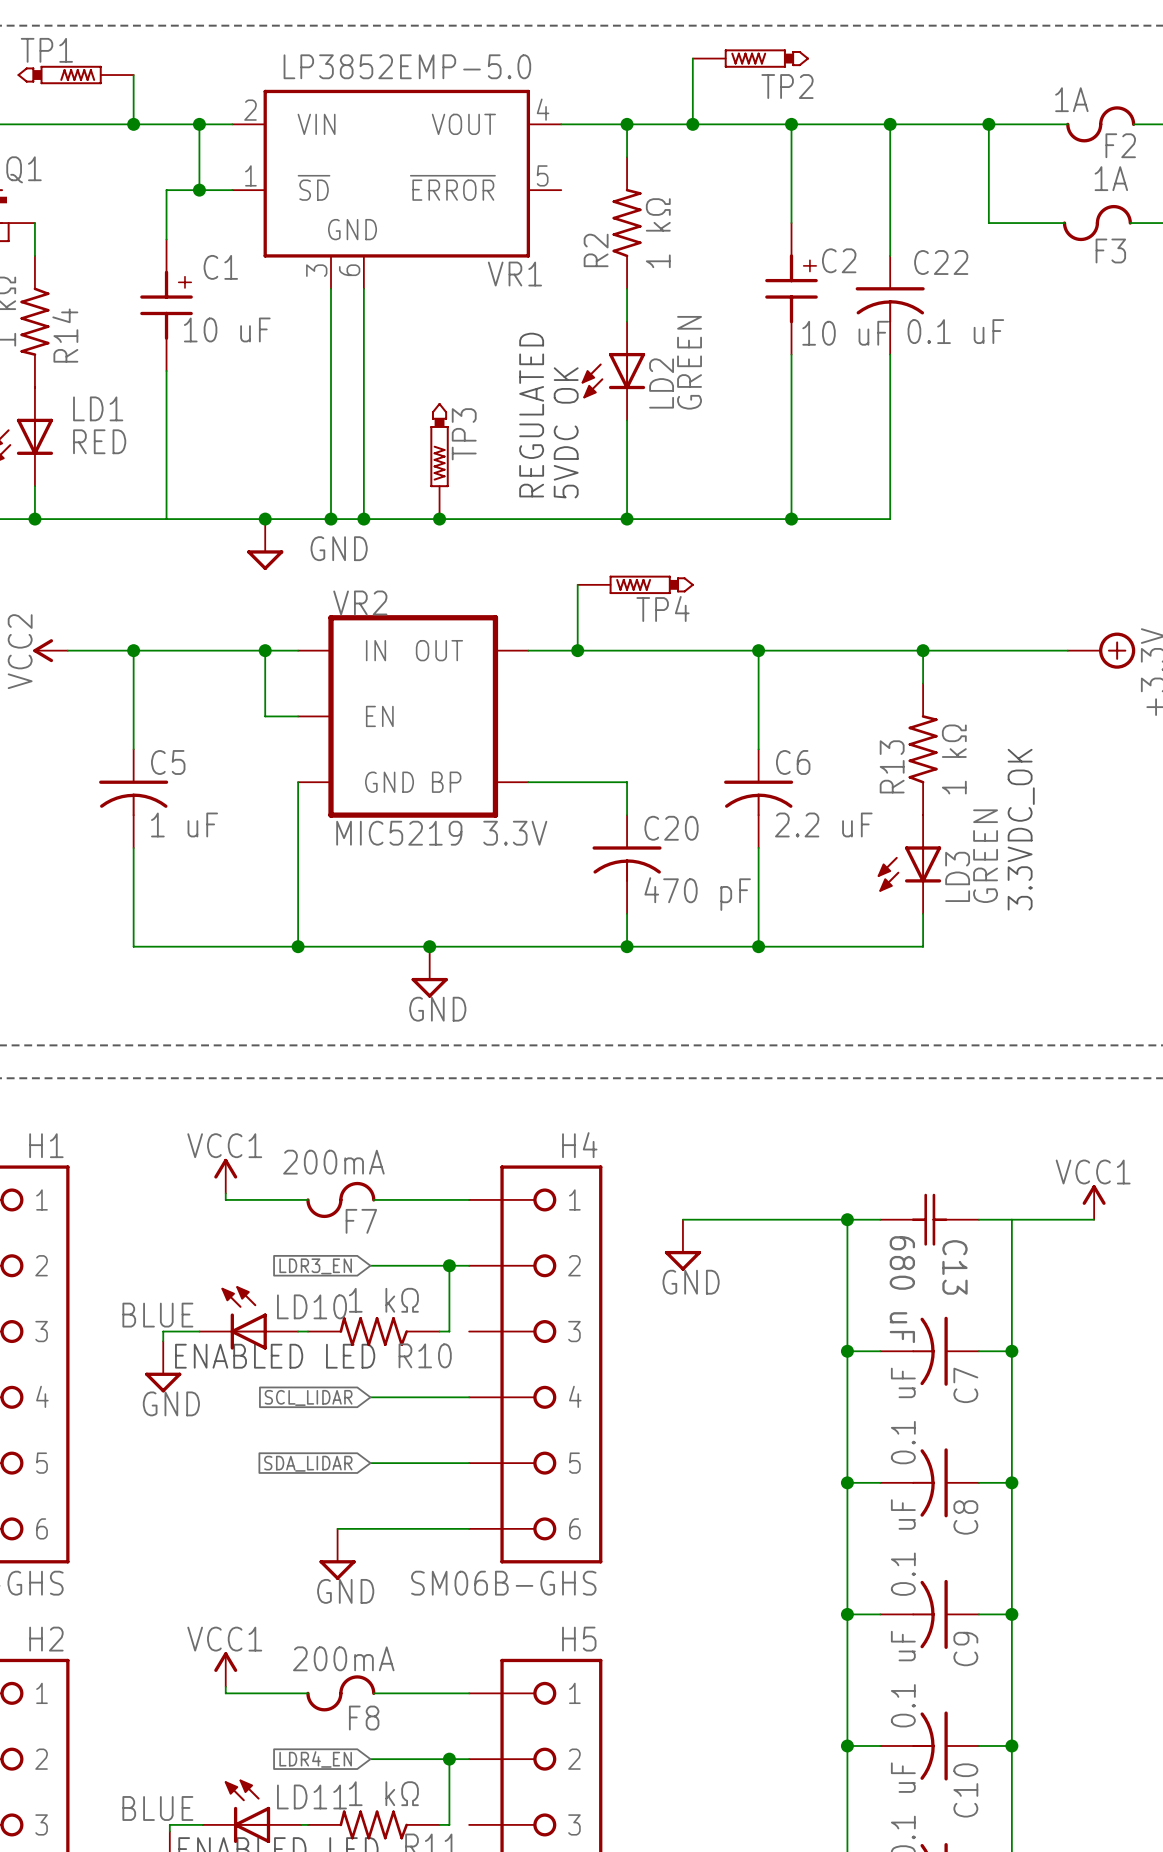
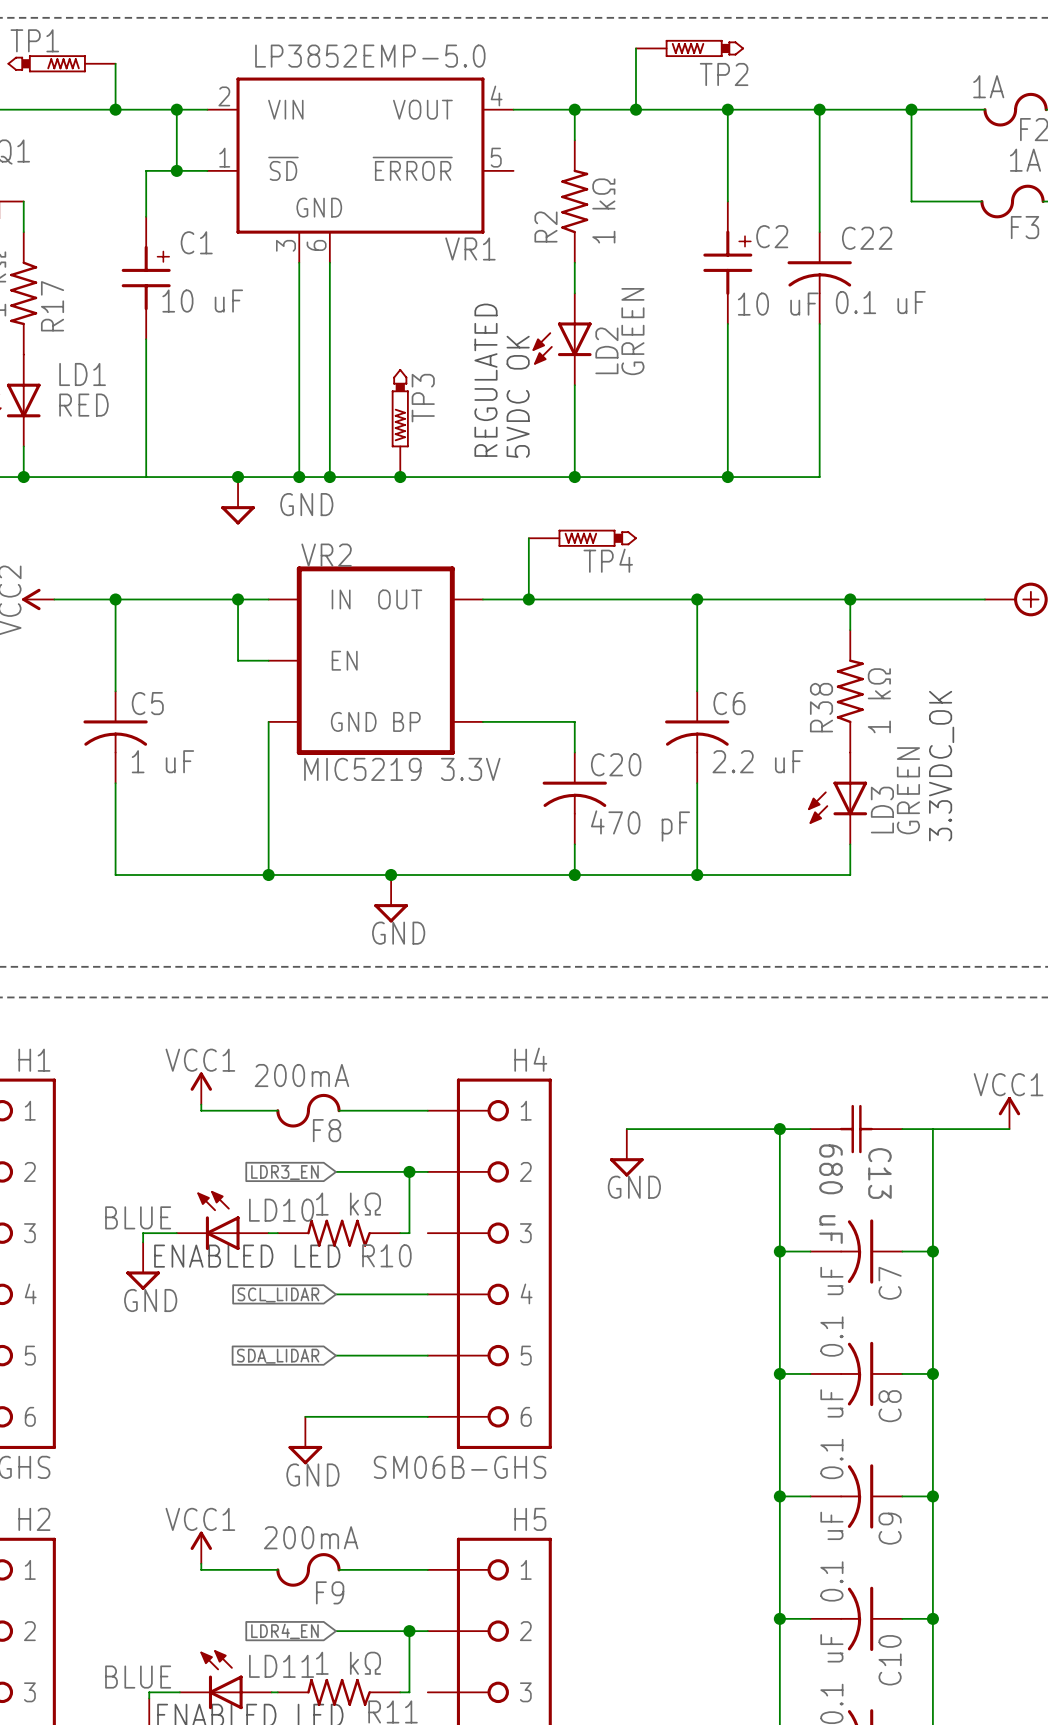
R14 name: R14 (65, 335) -> R17 (52, 306)
R13 name: R13 (892, 766) -> R38 (821, 707)
F7 name: F7 (361, 1221) -> F8 (327, 1130)
F8 name: F8 (364, 1718) -> F9 (330, 1592)

